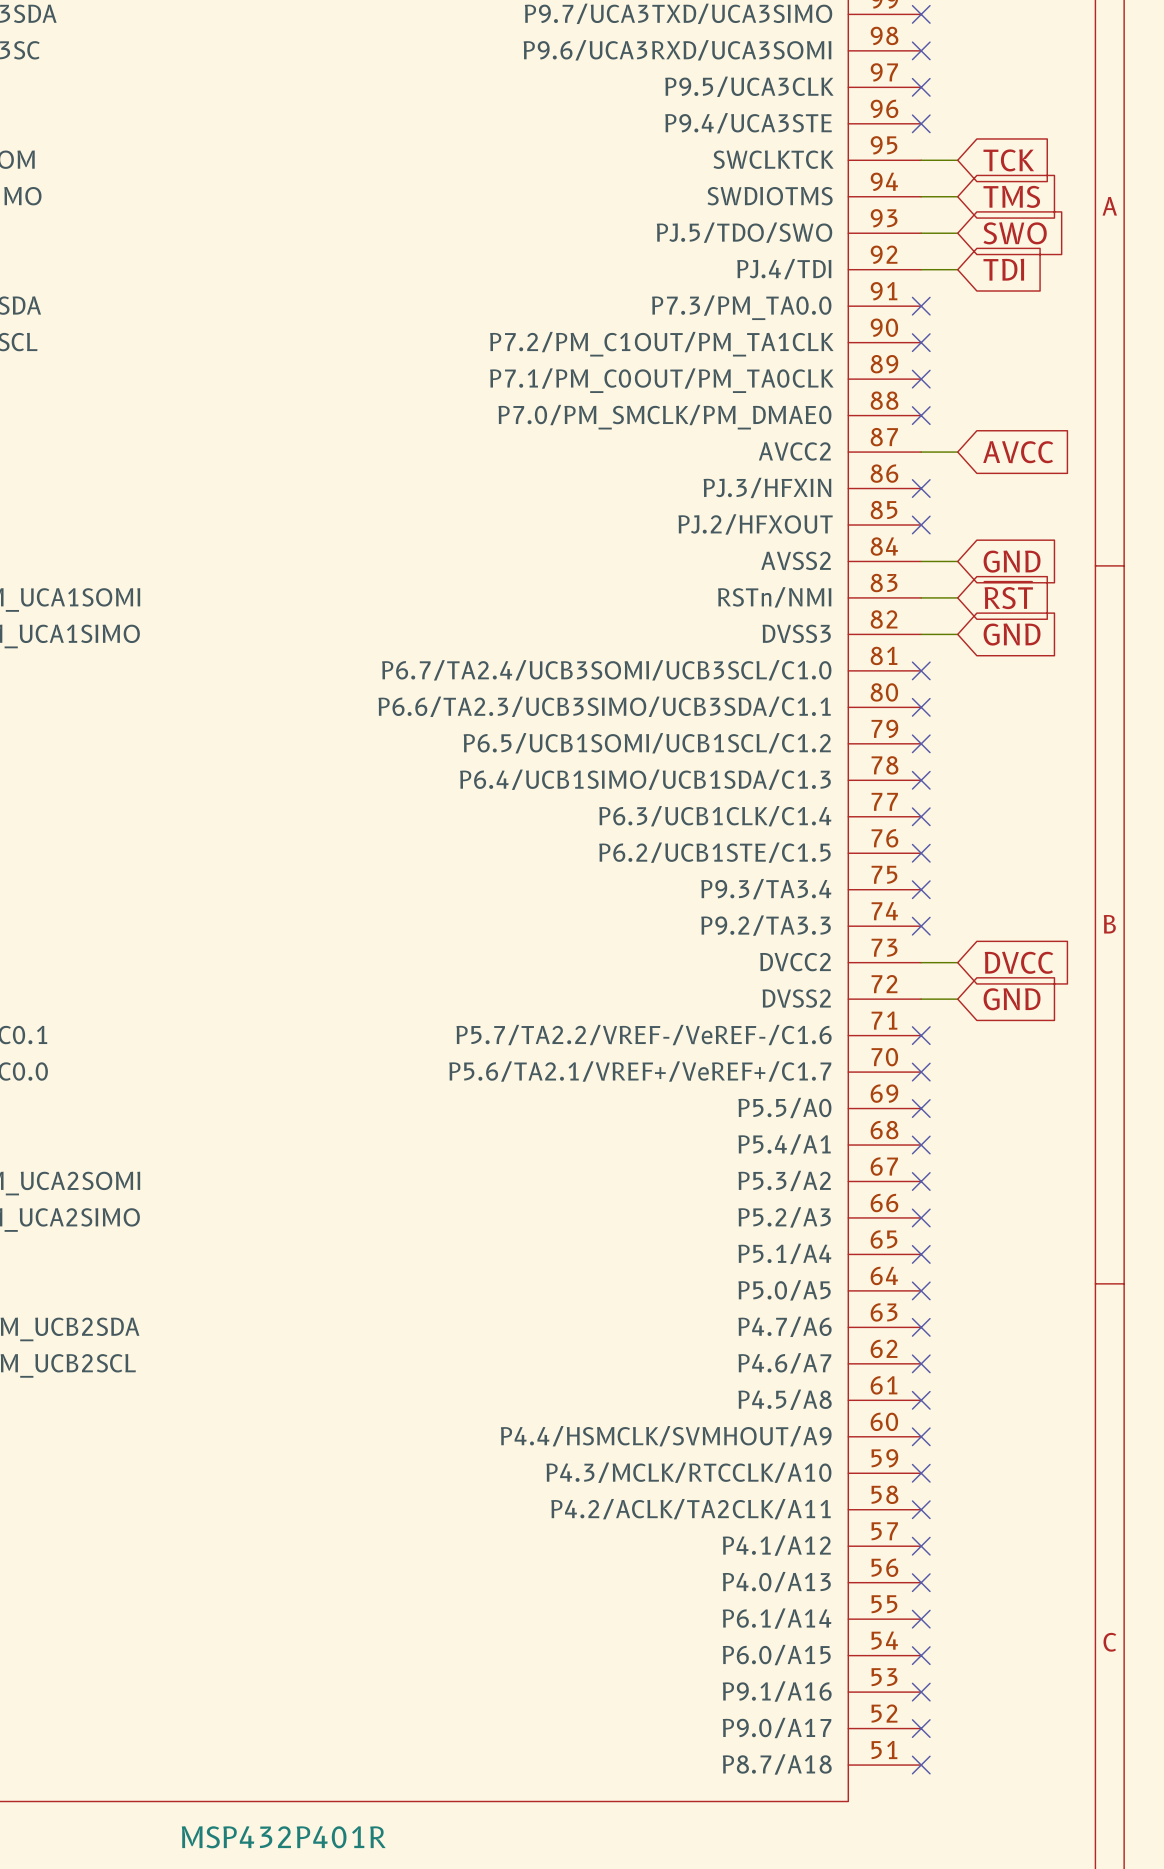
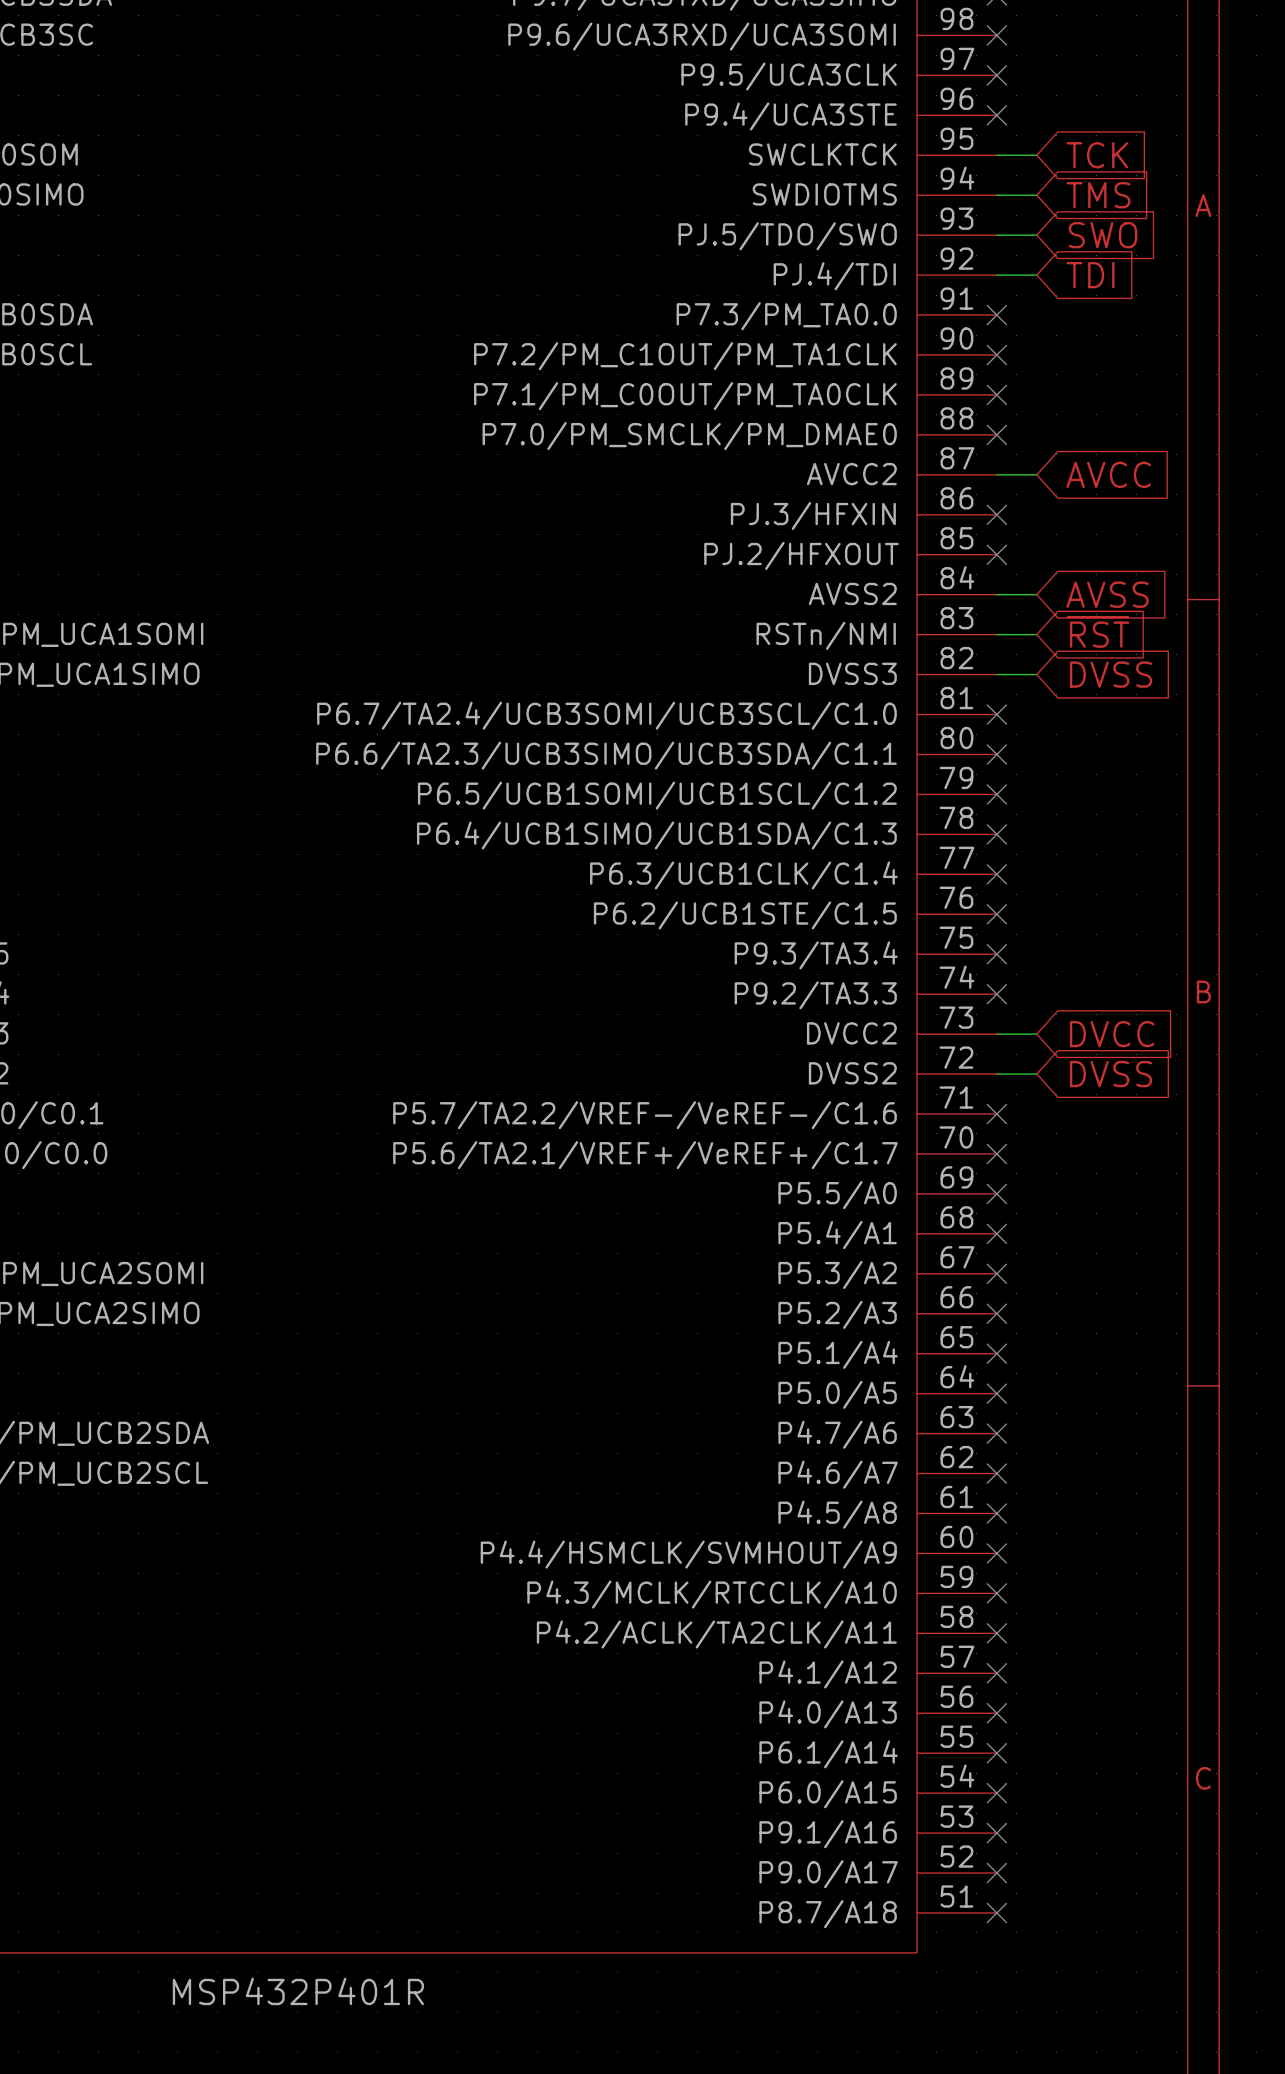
global label: GND (1012, 561) -> AVSS (1107, 594)
global label: GND (1012, 634) -> DVSS (1111, 674)
global label: GND (1012, 999) -> DVSS (1111, 1074)

